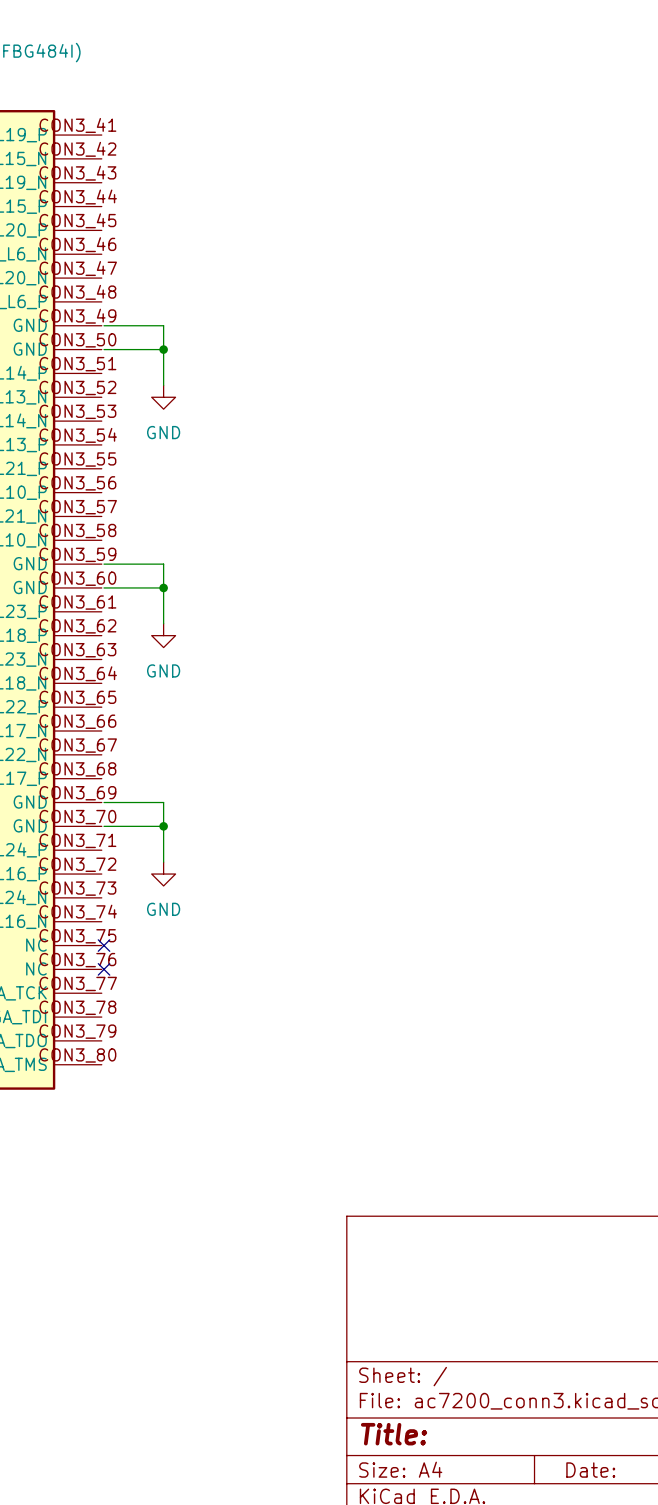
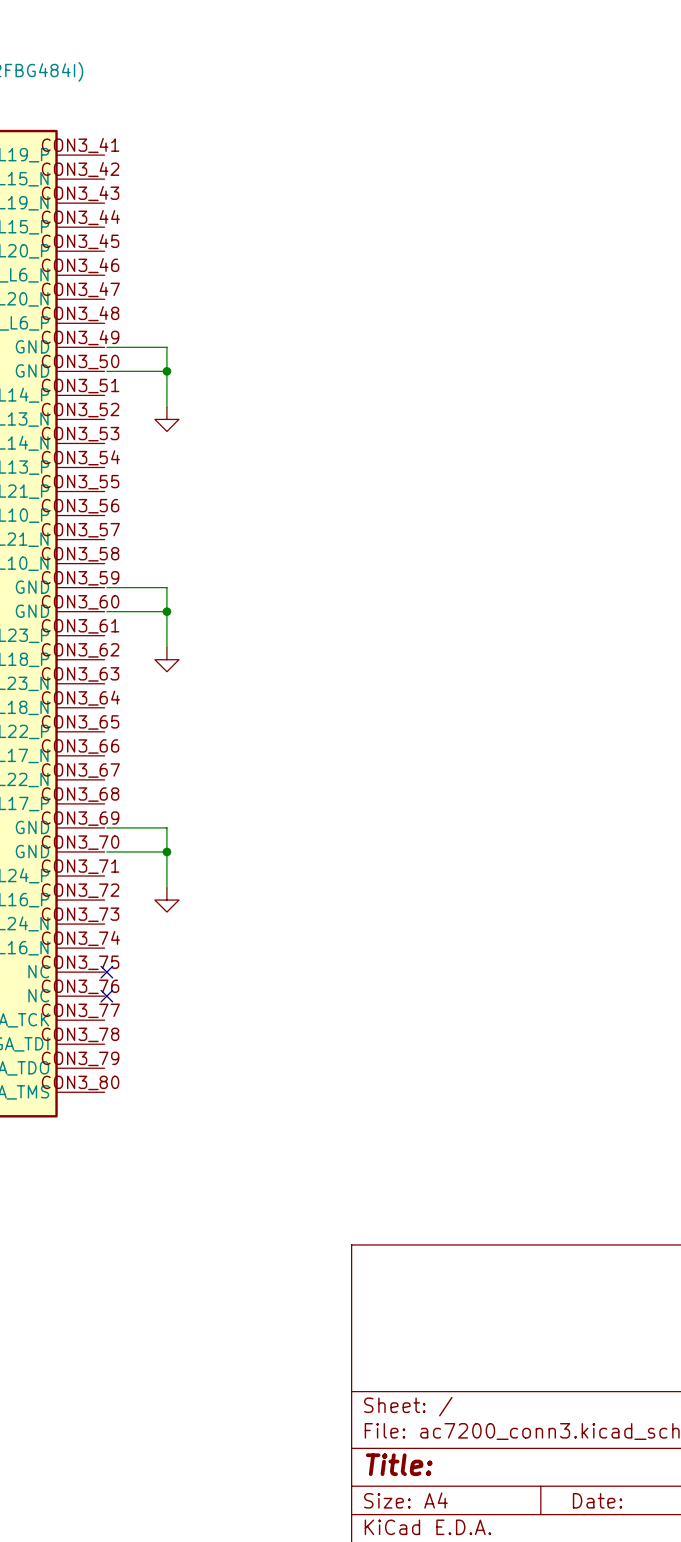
power symbol text: GND (163, 432) -> none
power symbol text: GND (163, 670) -> none
power symbol text: GND (163, 909) -> none

